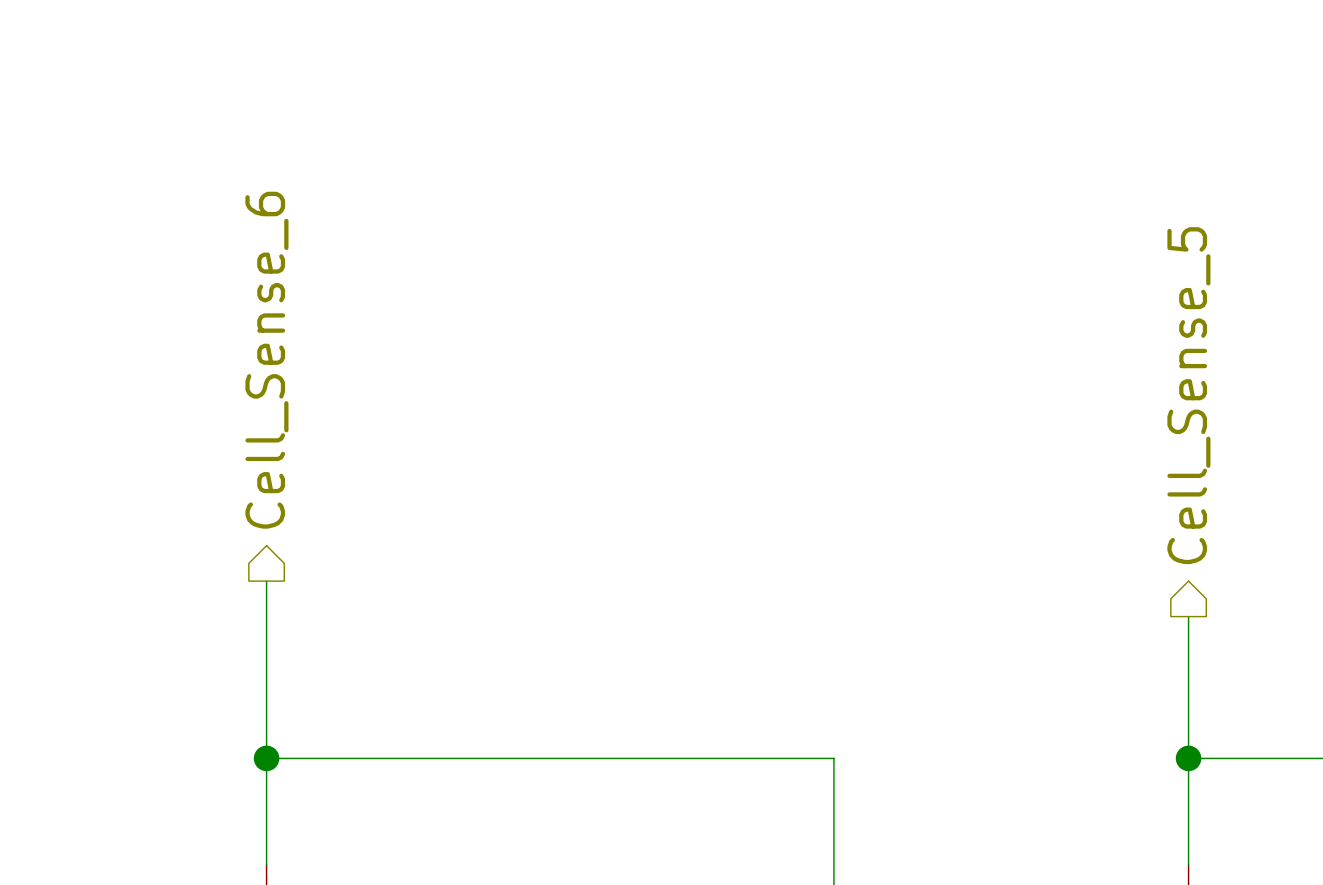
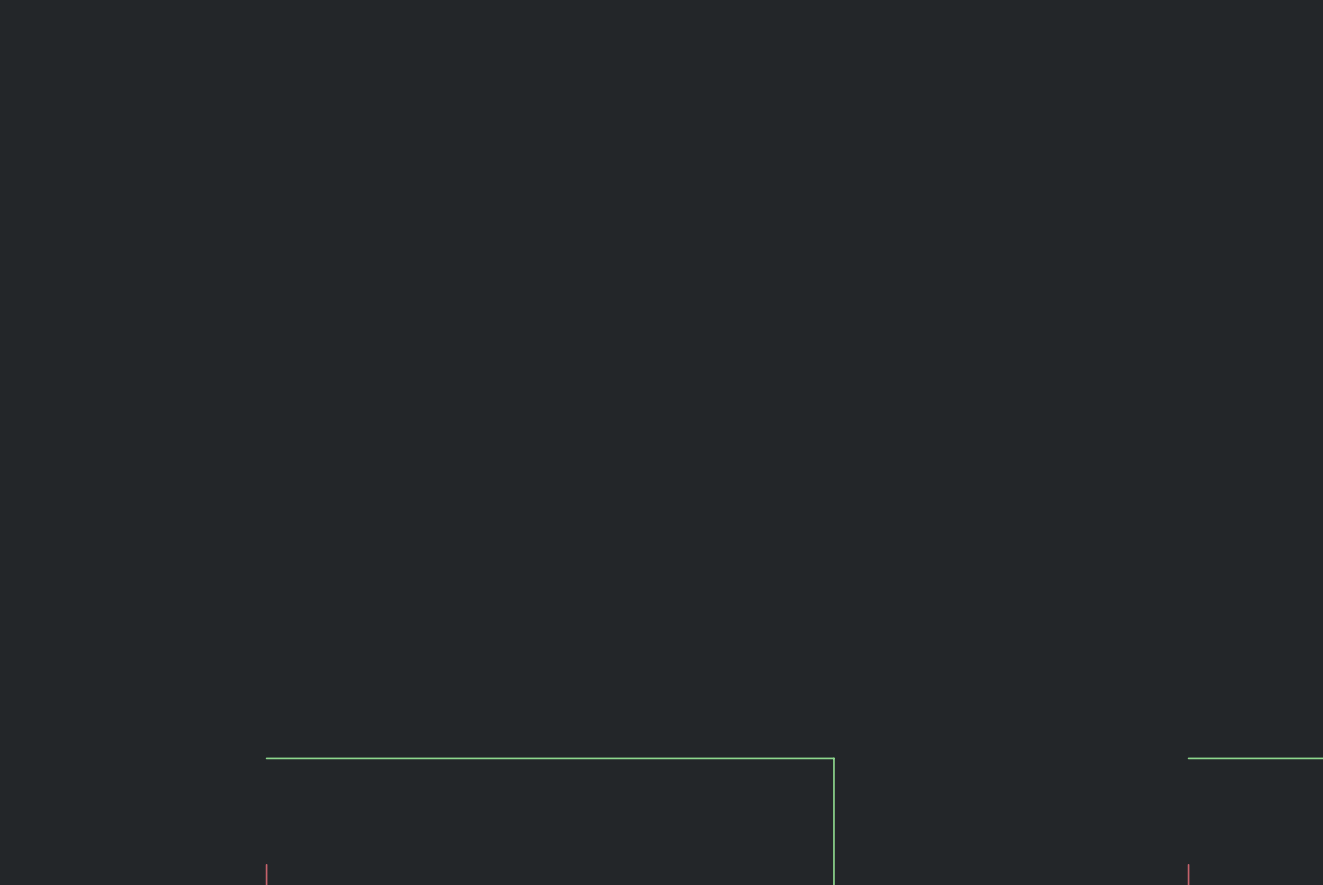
hierarchical label: Cell_Sense_6 (266, 360) -> none
hierarchical label: Cell_Sense_5 (1188, 395) -> none
wire: (266, 581) (266, 864) -> none
wire: (1188, 616) (1188, 864) -> none
junction: (266, 758) -> none
junction: (1188, 758) -> none

